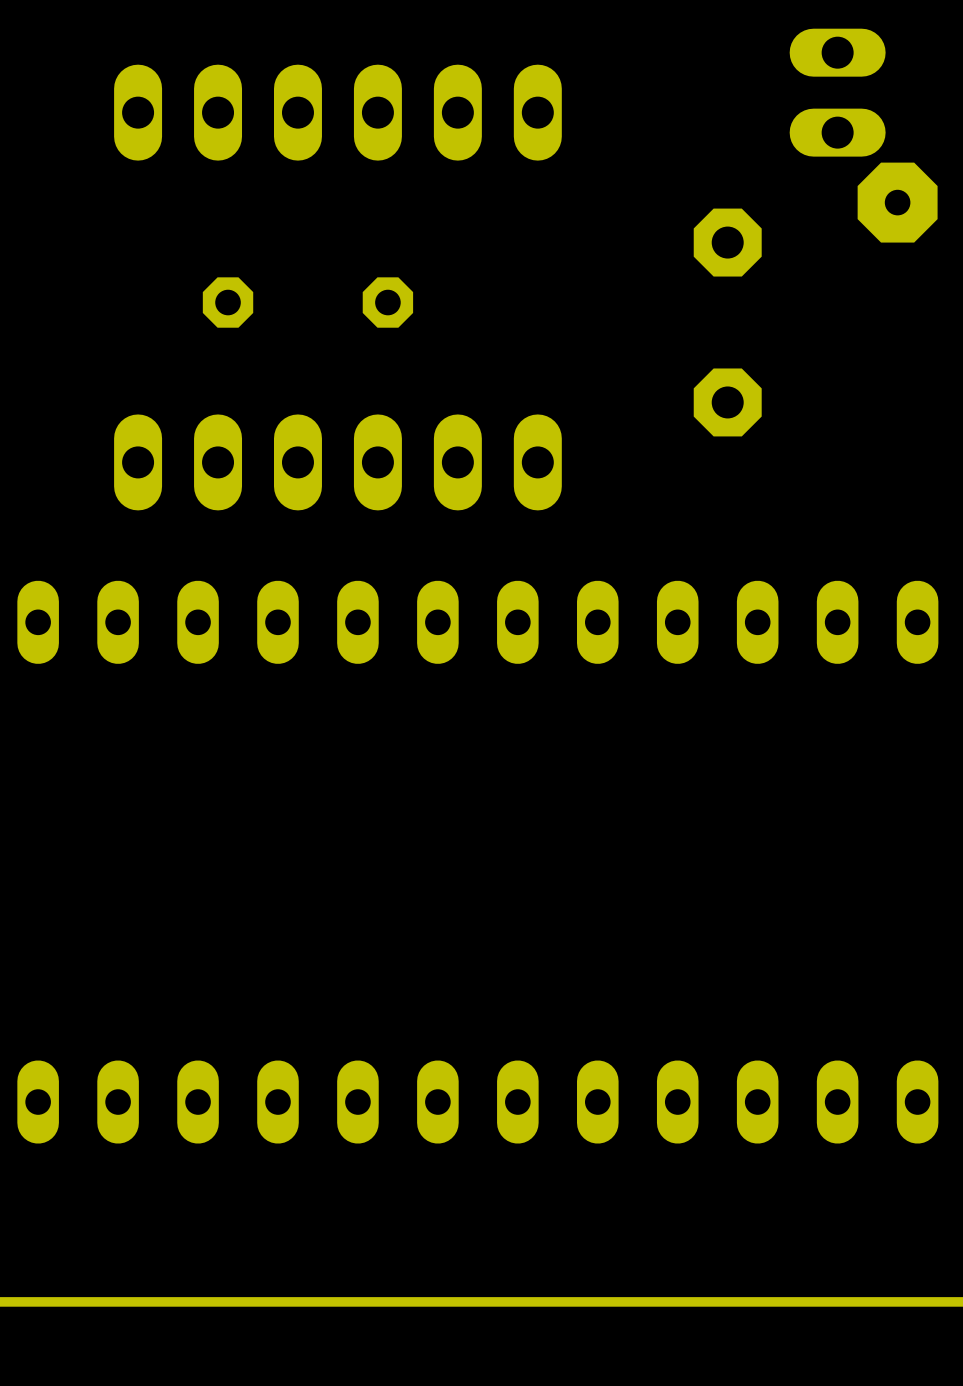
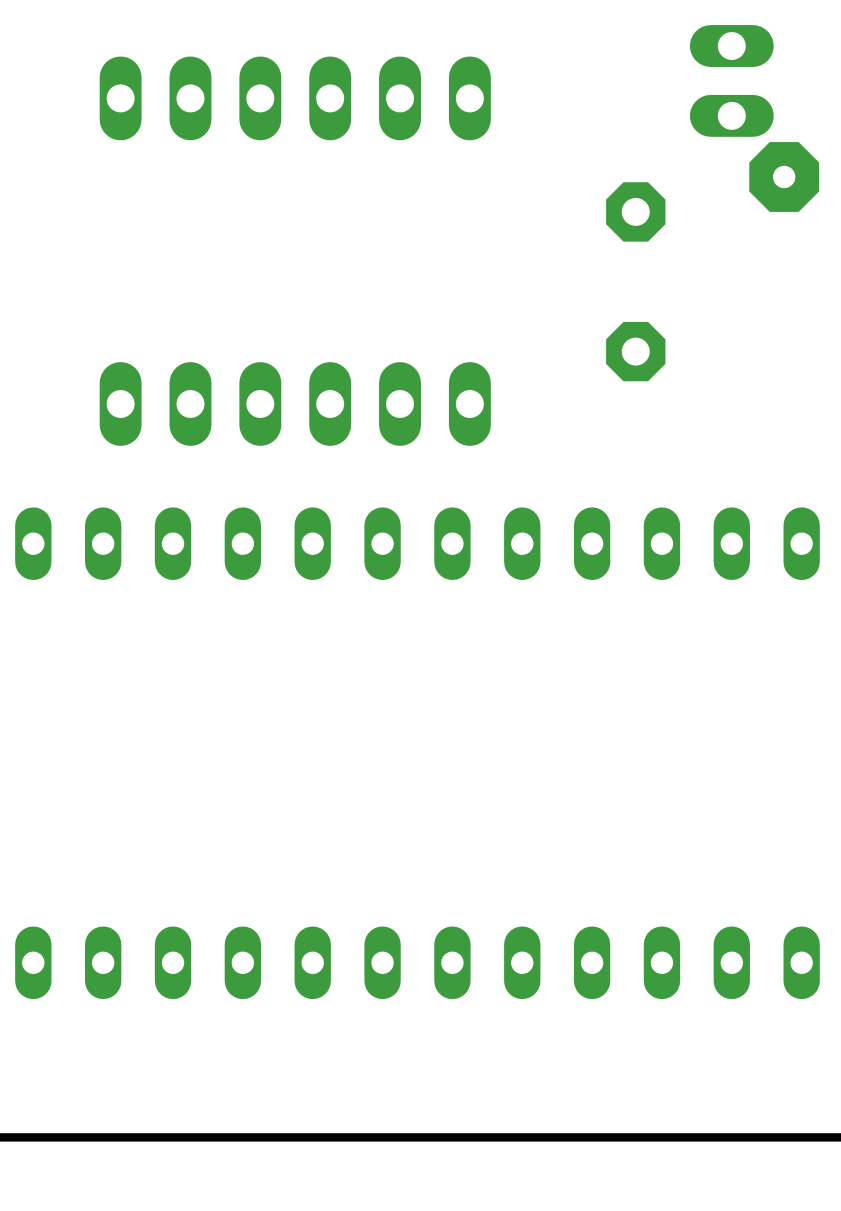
part: (228, 302) -> none
part: (387, 302) -> none

